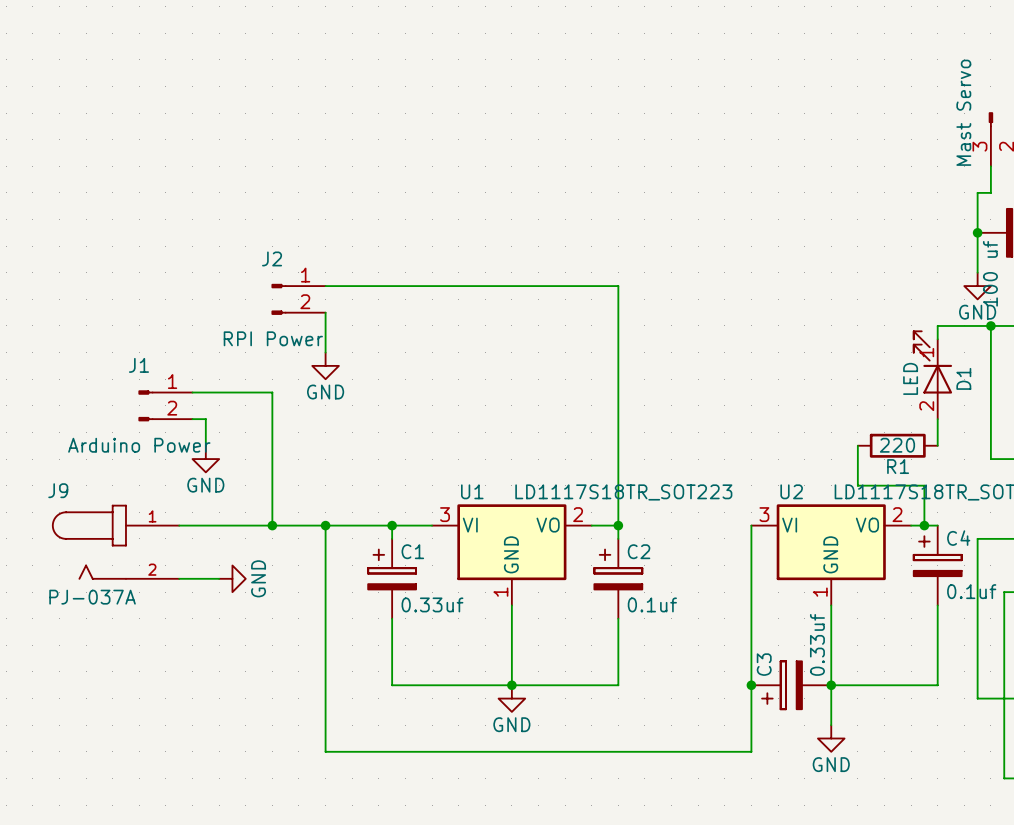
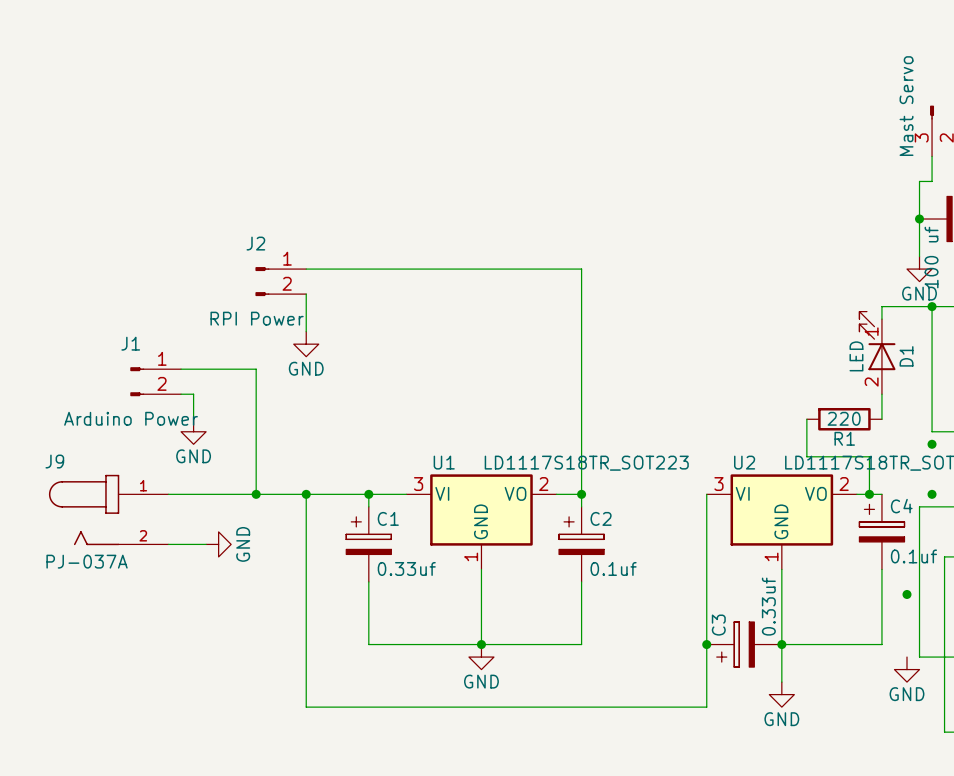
junction: none -> (932, 444)
junction: none -> (932, 494)
junction: none -> (907, 594)
power symbol: none -> GND (907, 669)

